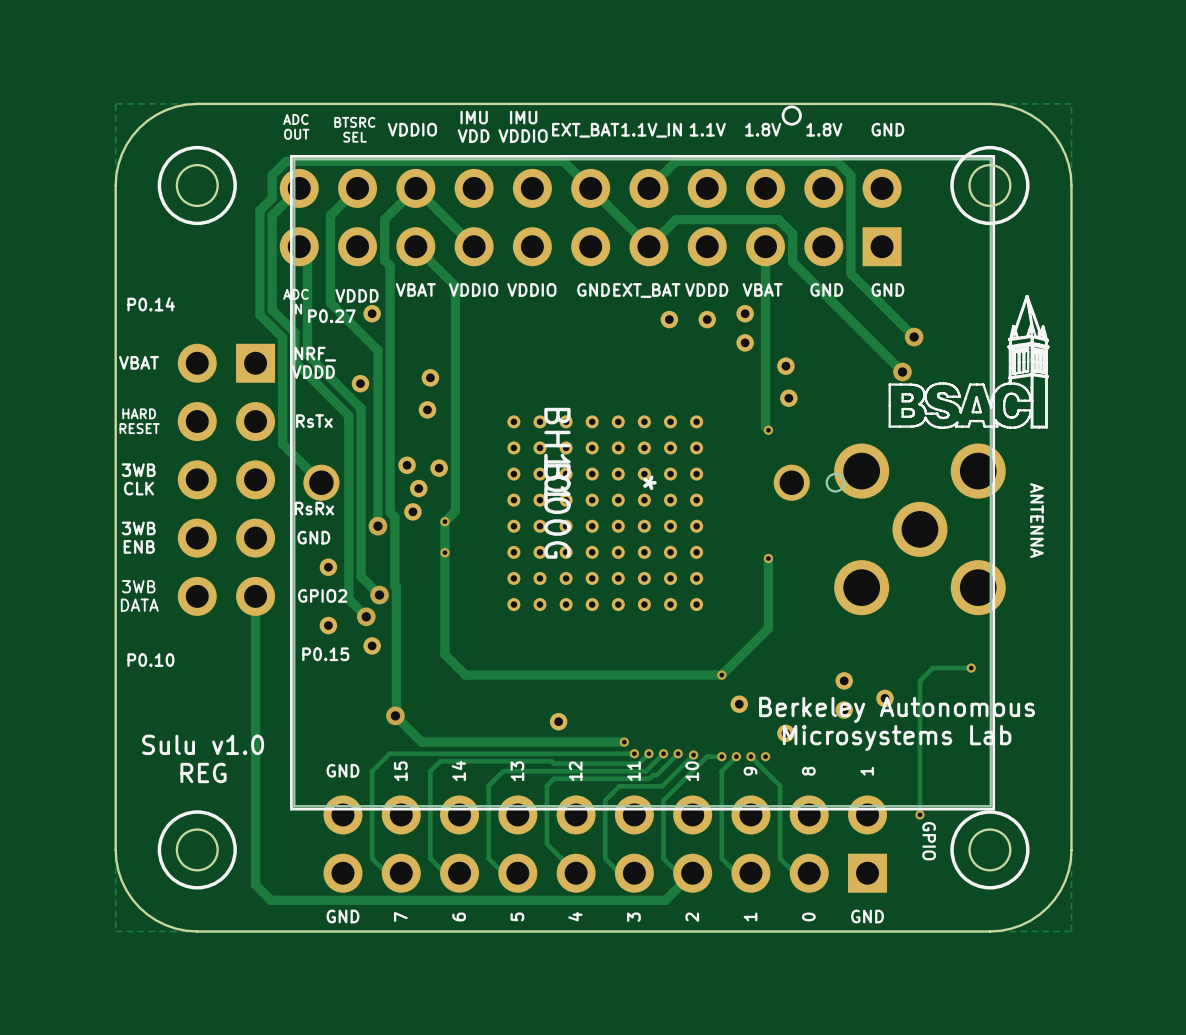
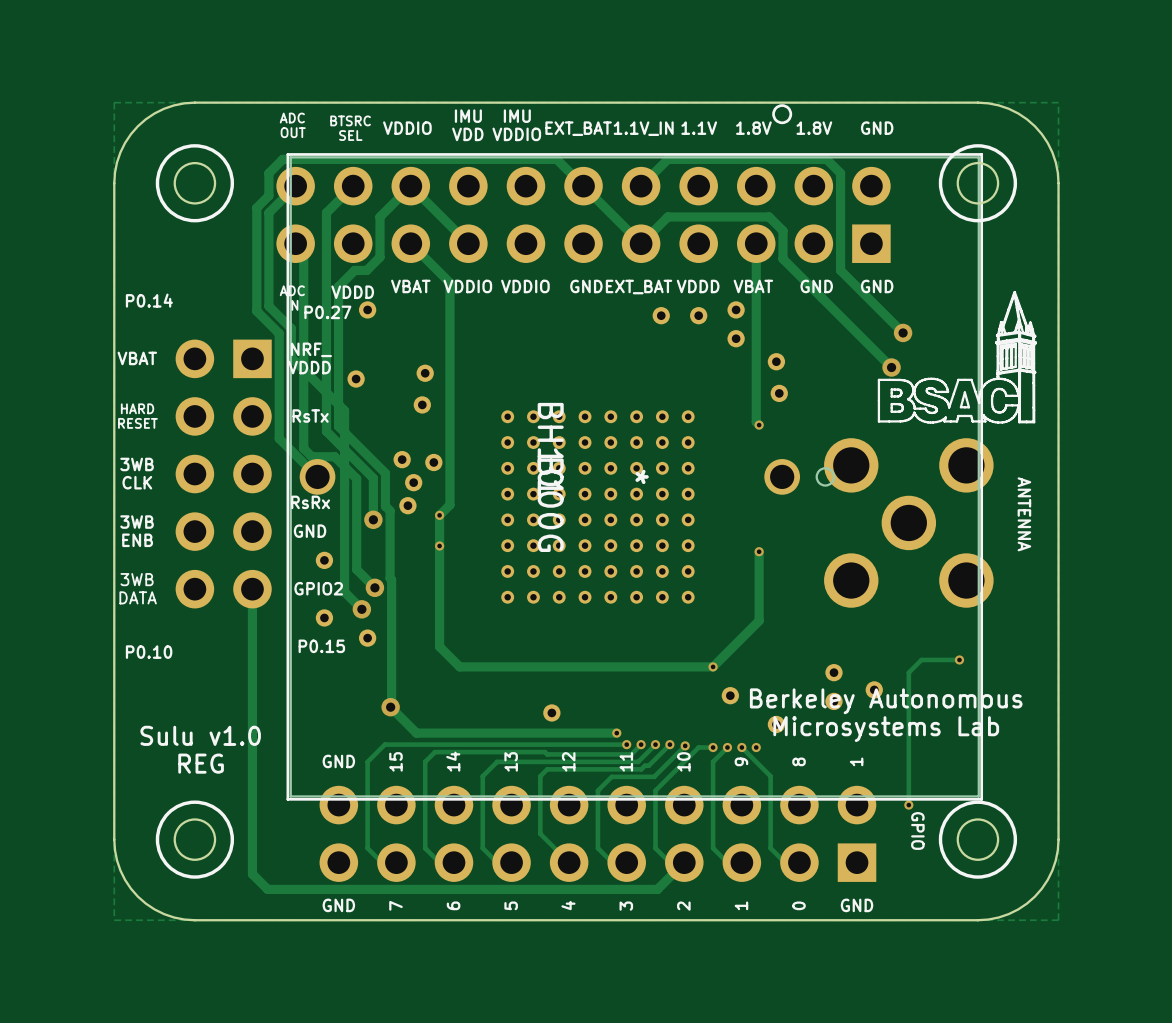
track: (384, 260) (390, 265) (390, 479) -> (379, 257) (366, 270) (354, 270) (338, 286) (338, 426) (385, 473)
track: (330, 302) (377, 350) (377, 484) -> (326, 299) (326, 431) (373, 478)
track: (307, 354) (361, 408) (361, 484) -> (303, 350) (303, 448) (311, 456) (334, 456) (356, 478)

